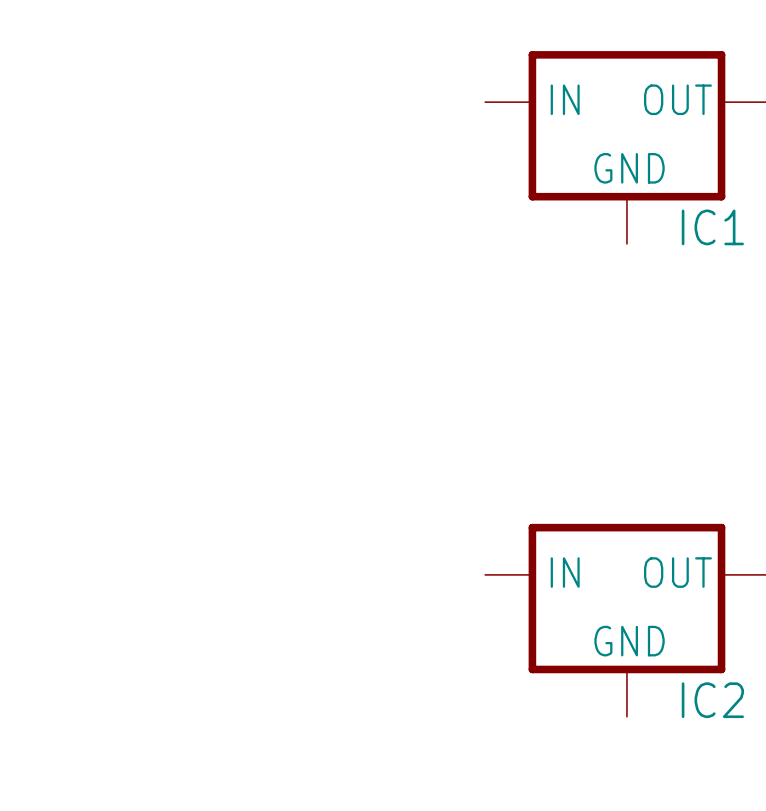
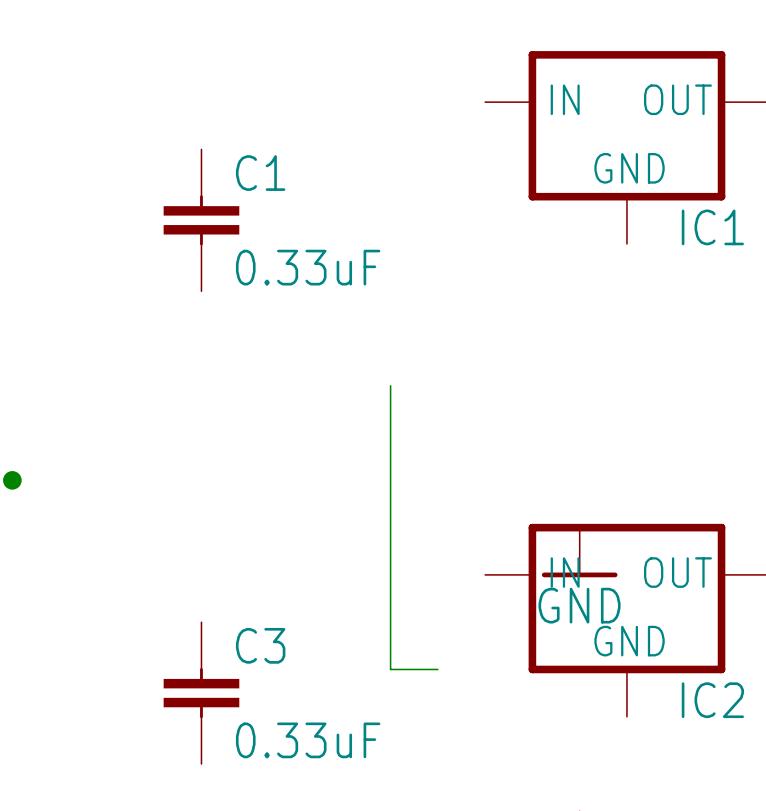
C1: none -> 0.33uF (201, 220)
wire: none -> (390, 385) (390, 669) (437, 669)
junction: none -> (12, 480)
power symbol: none -> GND (579, 552)
C3: none -> 0.33uF (201, 693)

